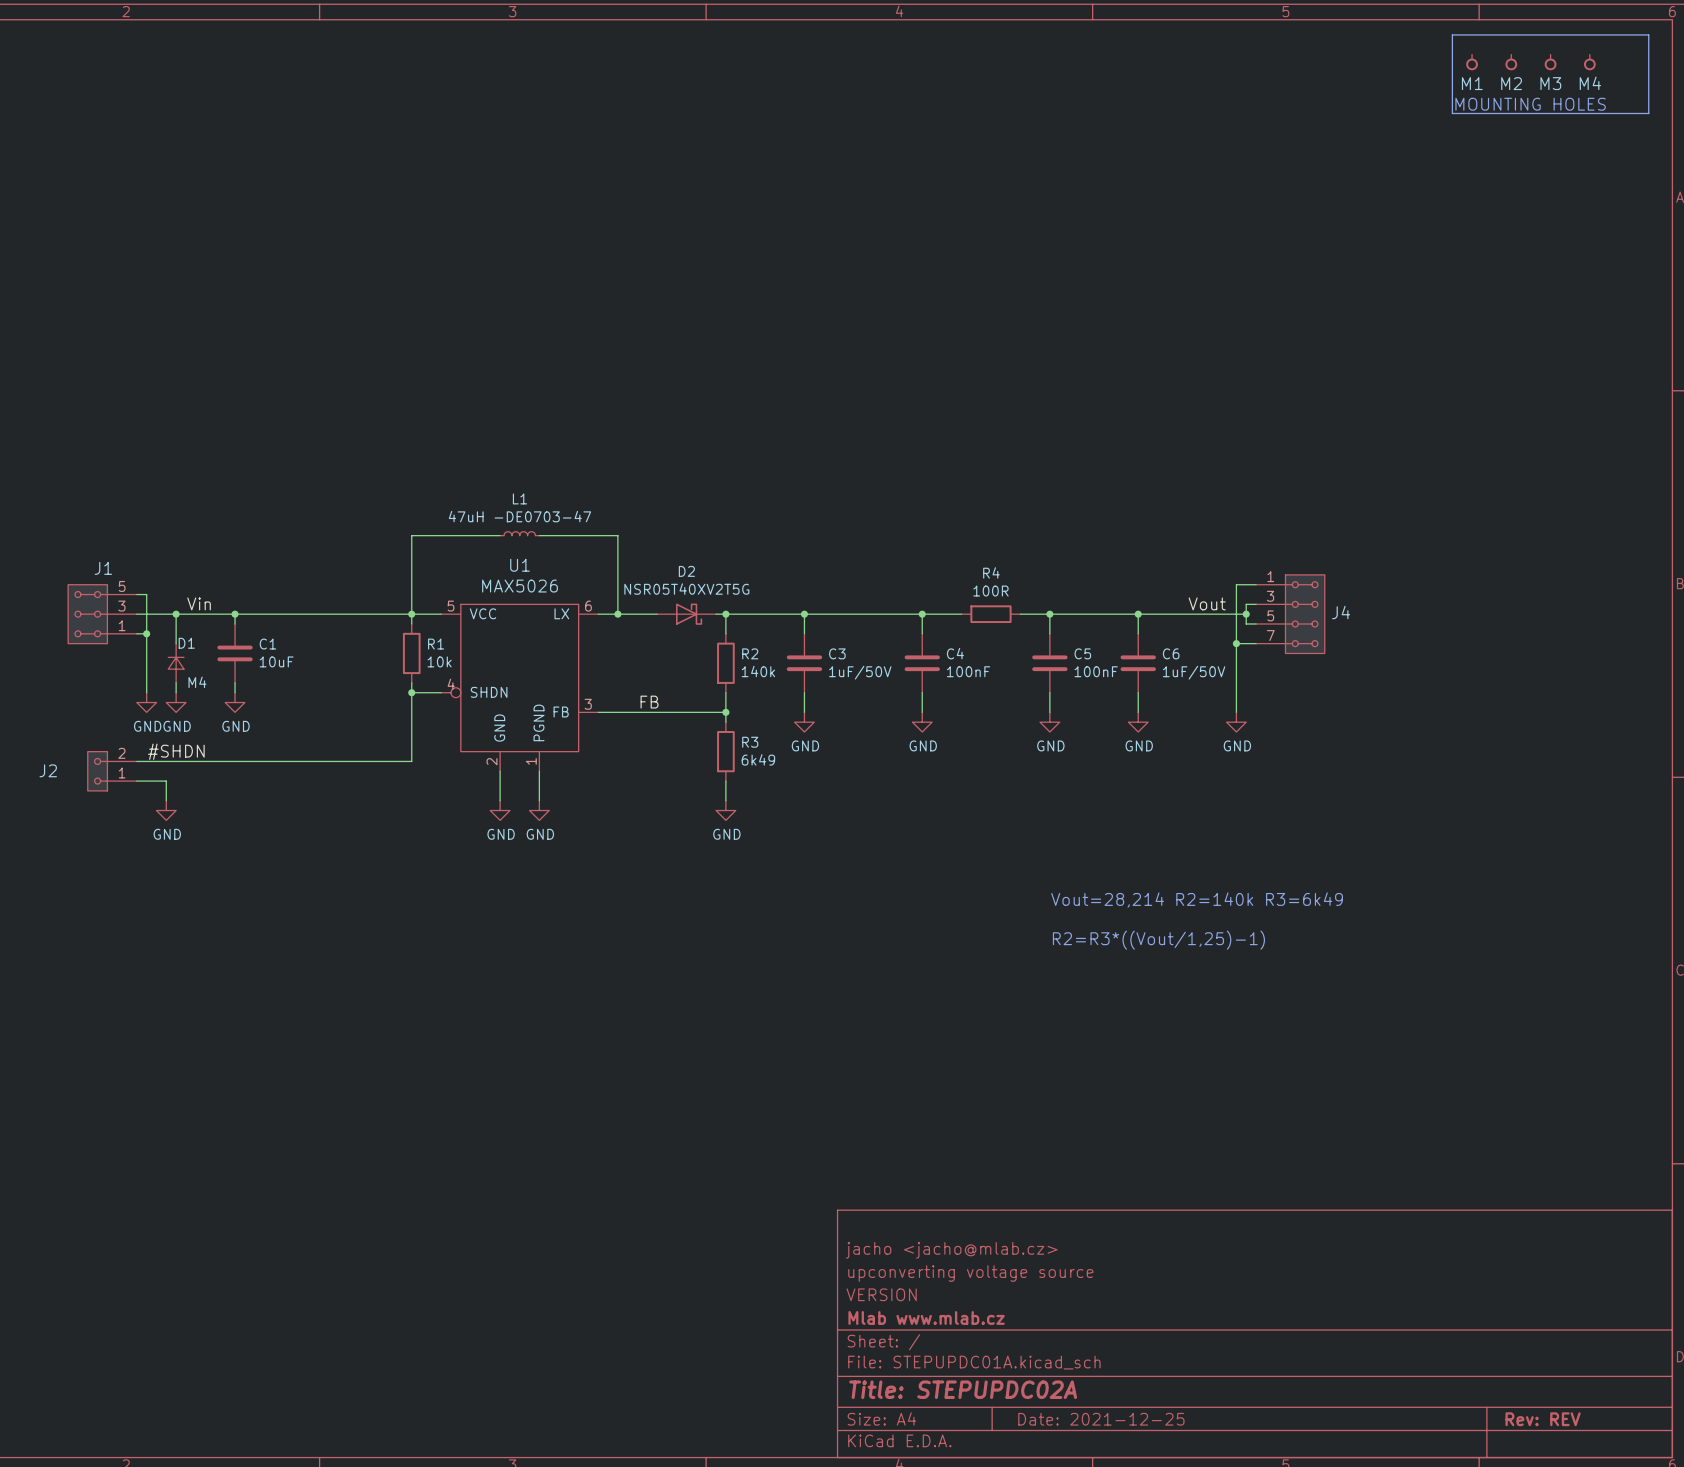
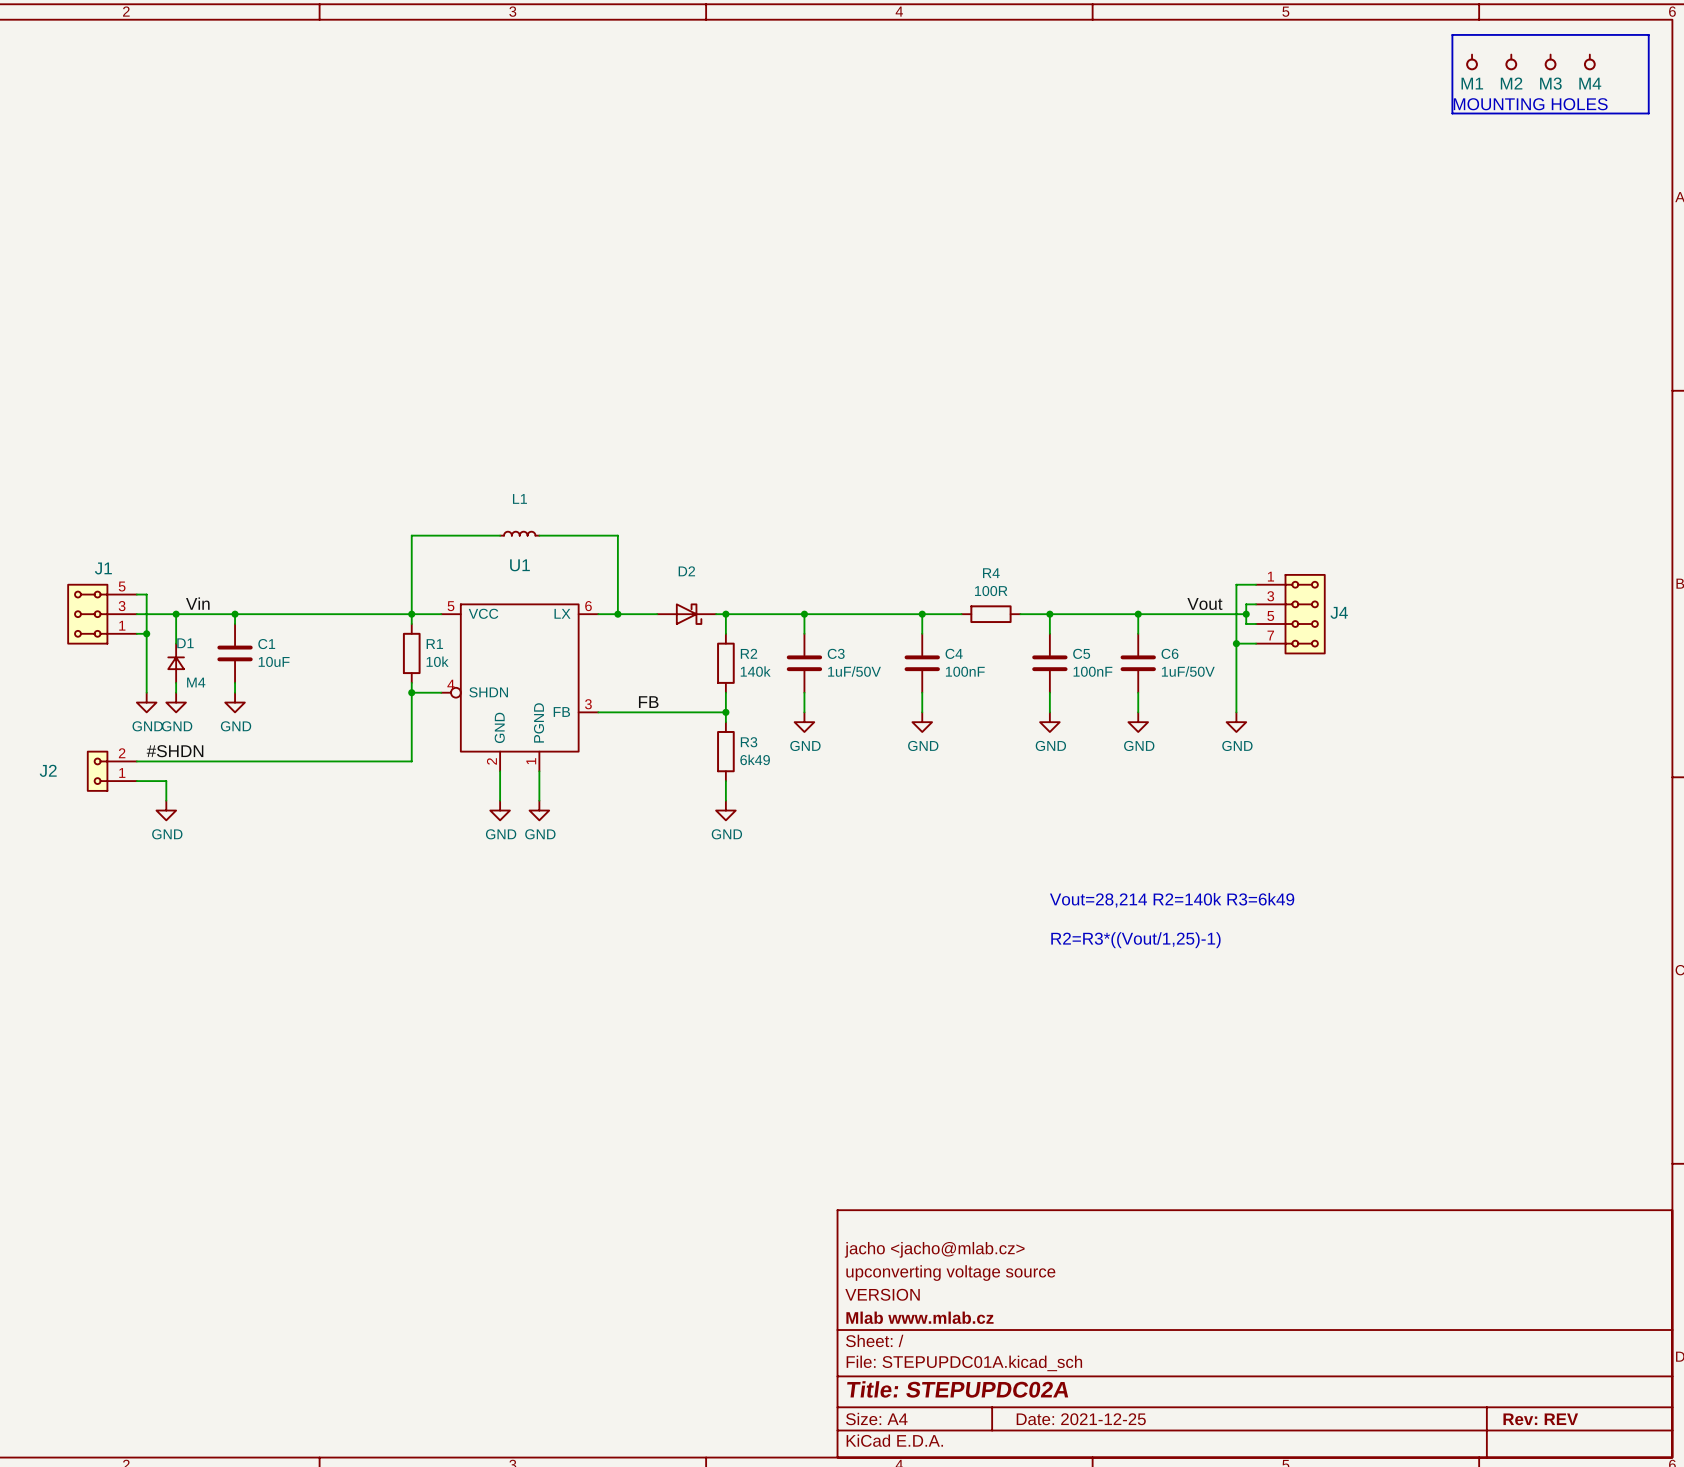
L1 value: 47uH -DE0703-47 (519, 516) -> none
U1 value: MAX5026 (520, 586) -> none
D2 value: NSR05T40XV2T5G (686, 589) -> none

